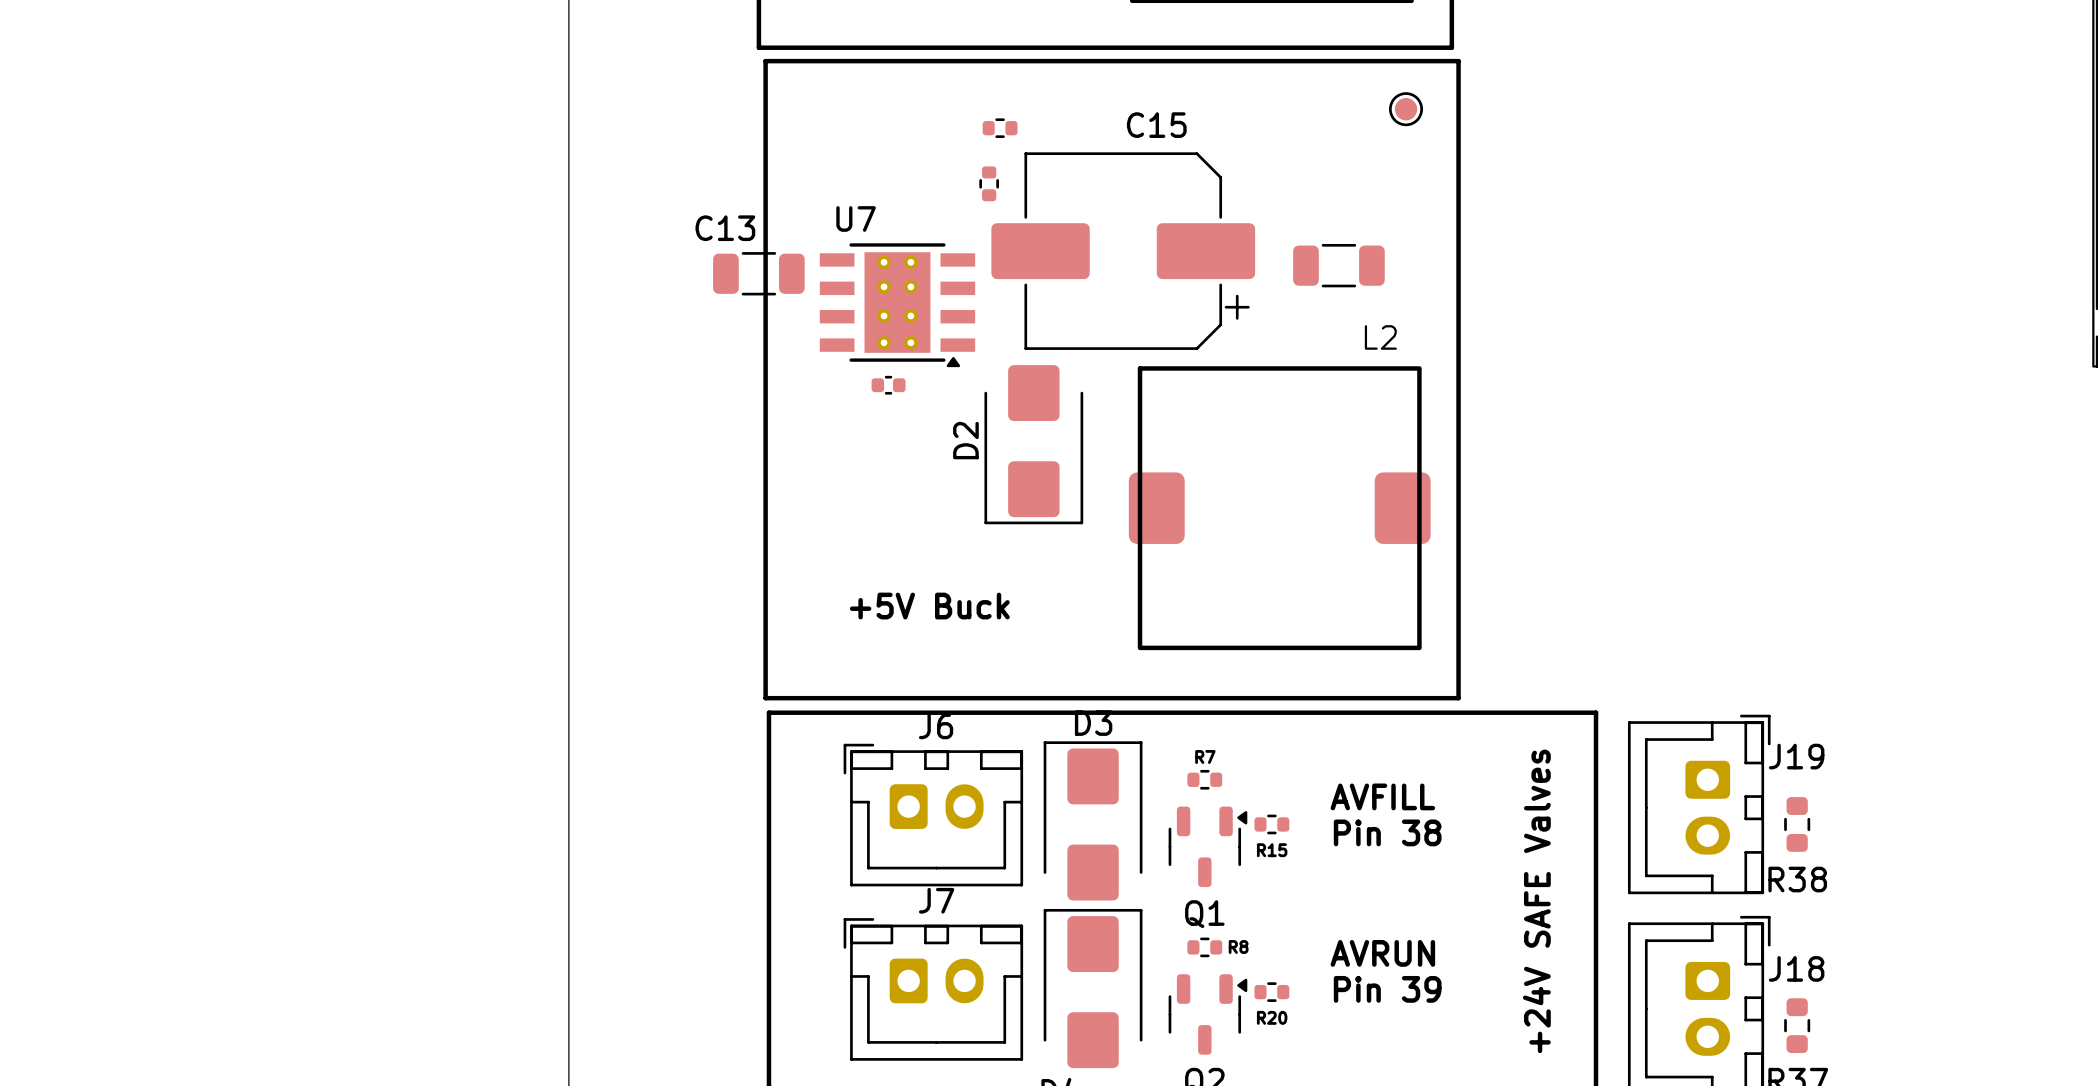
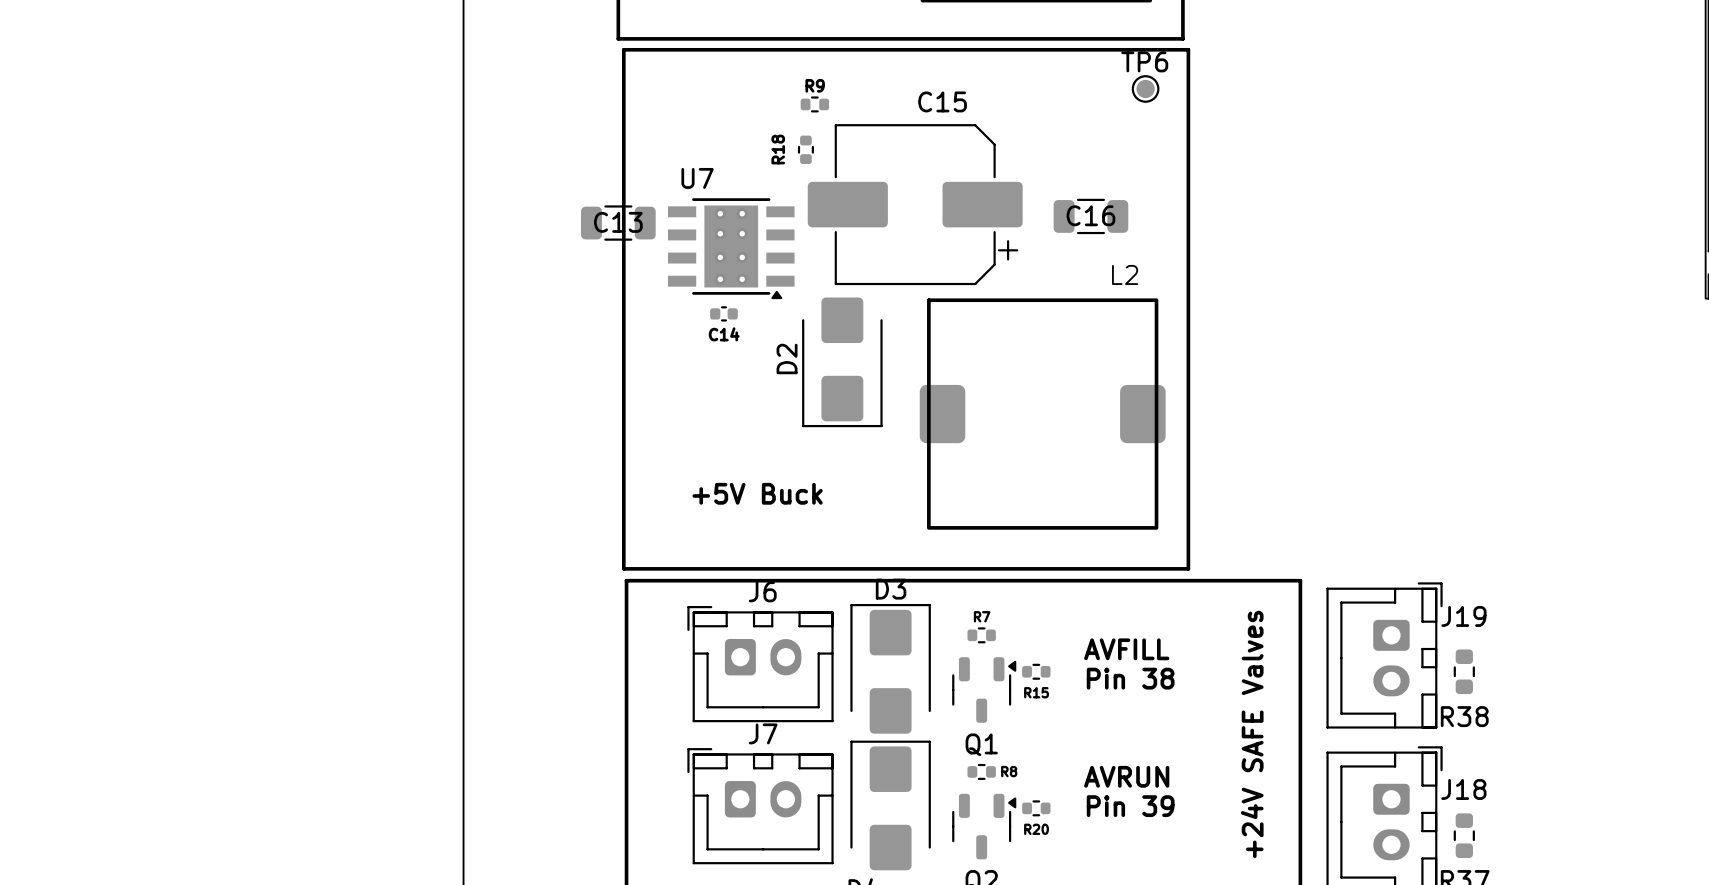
TP6 name: none -> TP6 (1144, 61)
R9 name: none -> R9 (815, 85)
R18 name: none -> R18 (778, 149)
C13 name position: C13 (725, 228) -> C13 (618, 222)
C16 name: none -> C16 (1090, 215)
C14 name: none -> C14 (724, 334)

